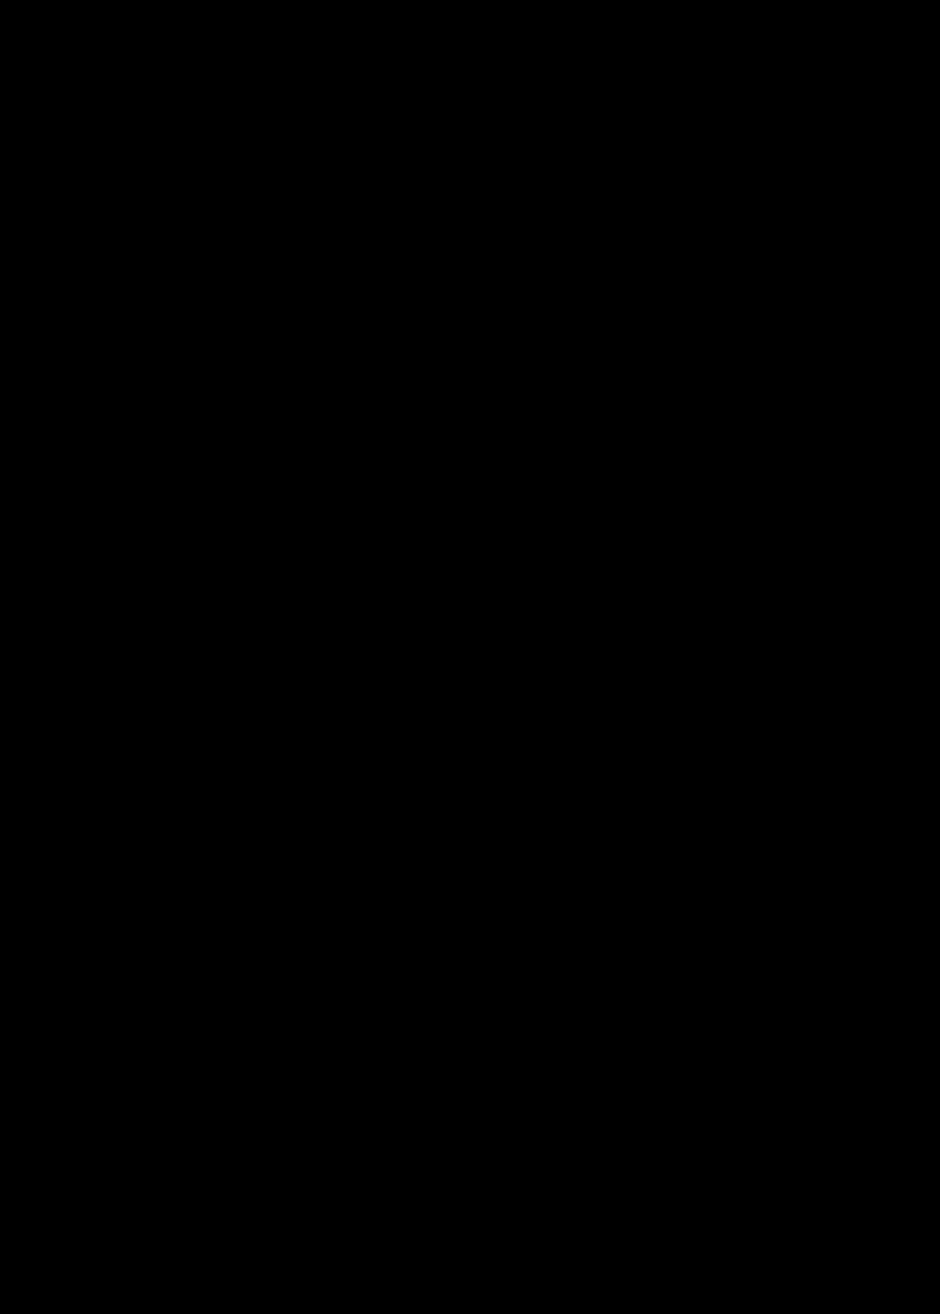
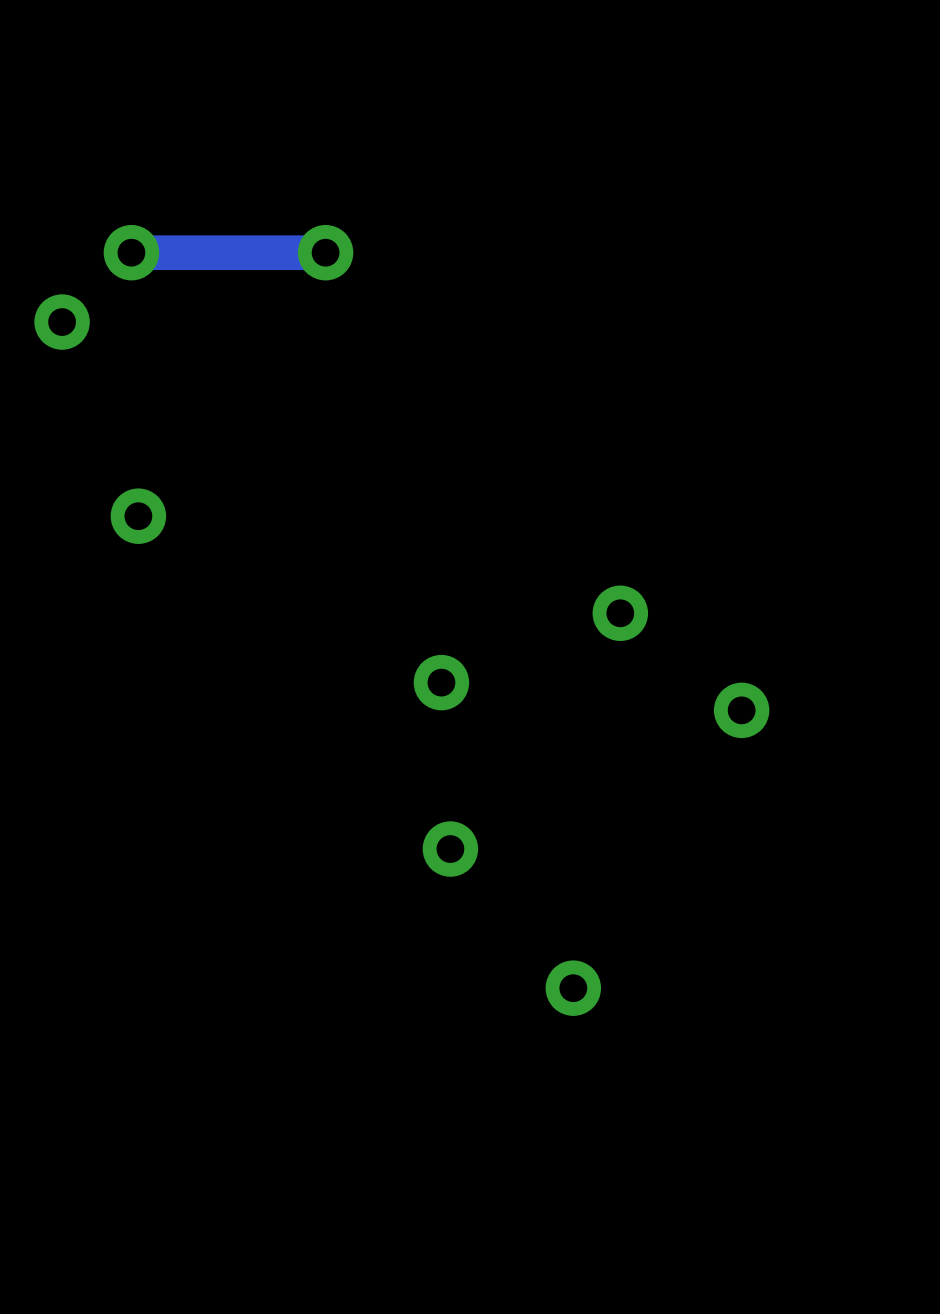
via: none -> (131, 252)
track: none -> (325, 252) (131, 252)
via: none -> (325, 252)
via: none -> (62, 322)
via: none -> (138, 516)
via: none -> (620, 613)
via: none -> (441, 682)
via: none -> (741, 710)
via: none -> (450, 849)
via: none -> (573, 988)

